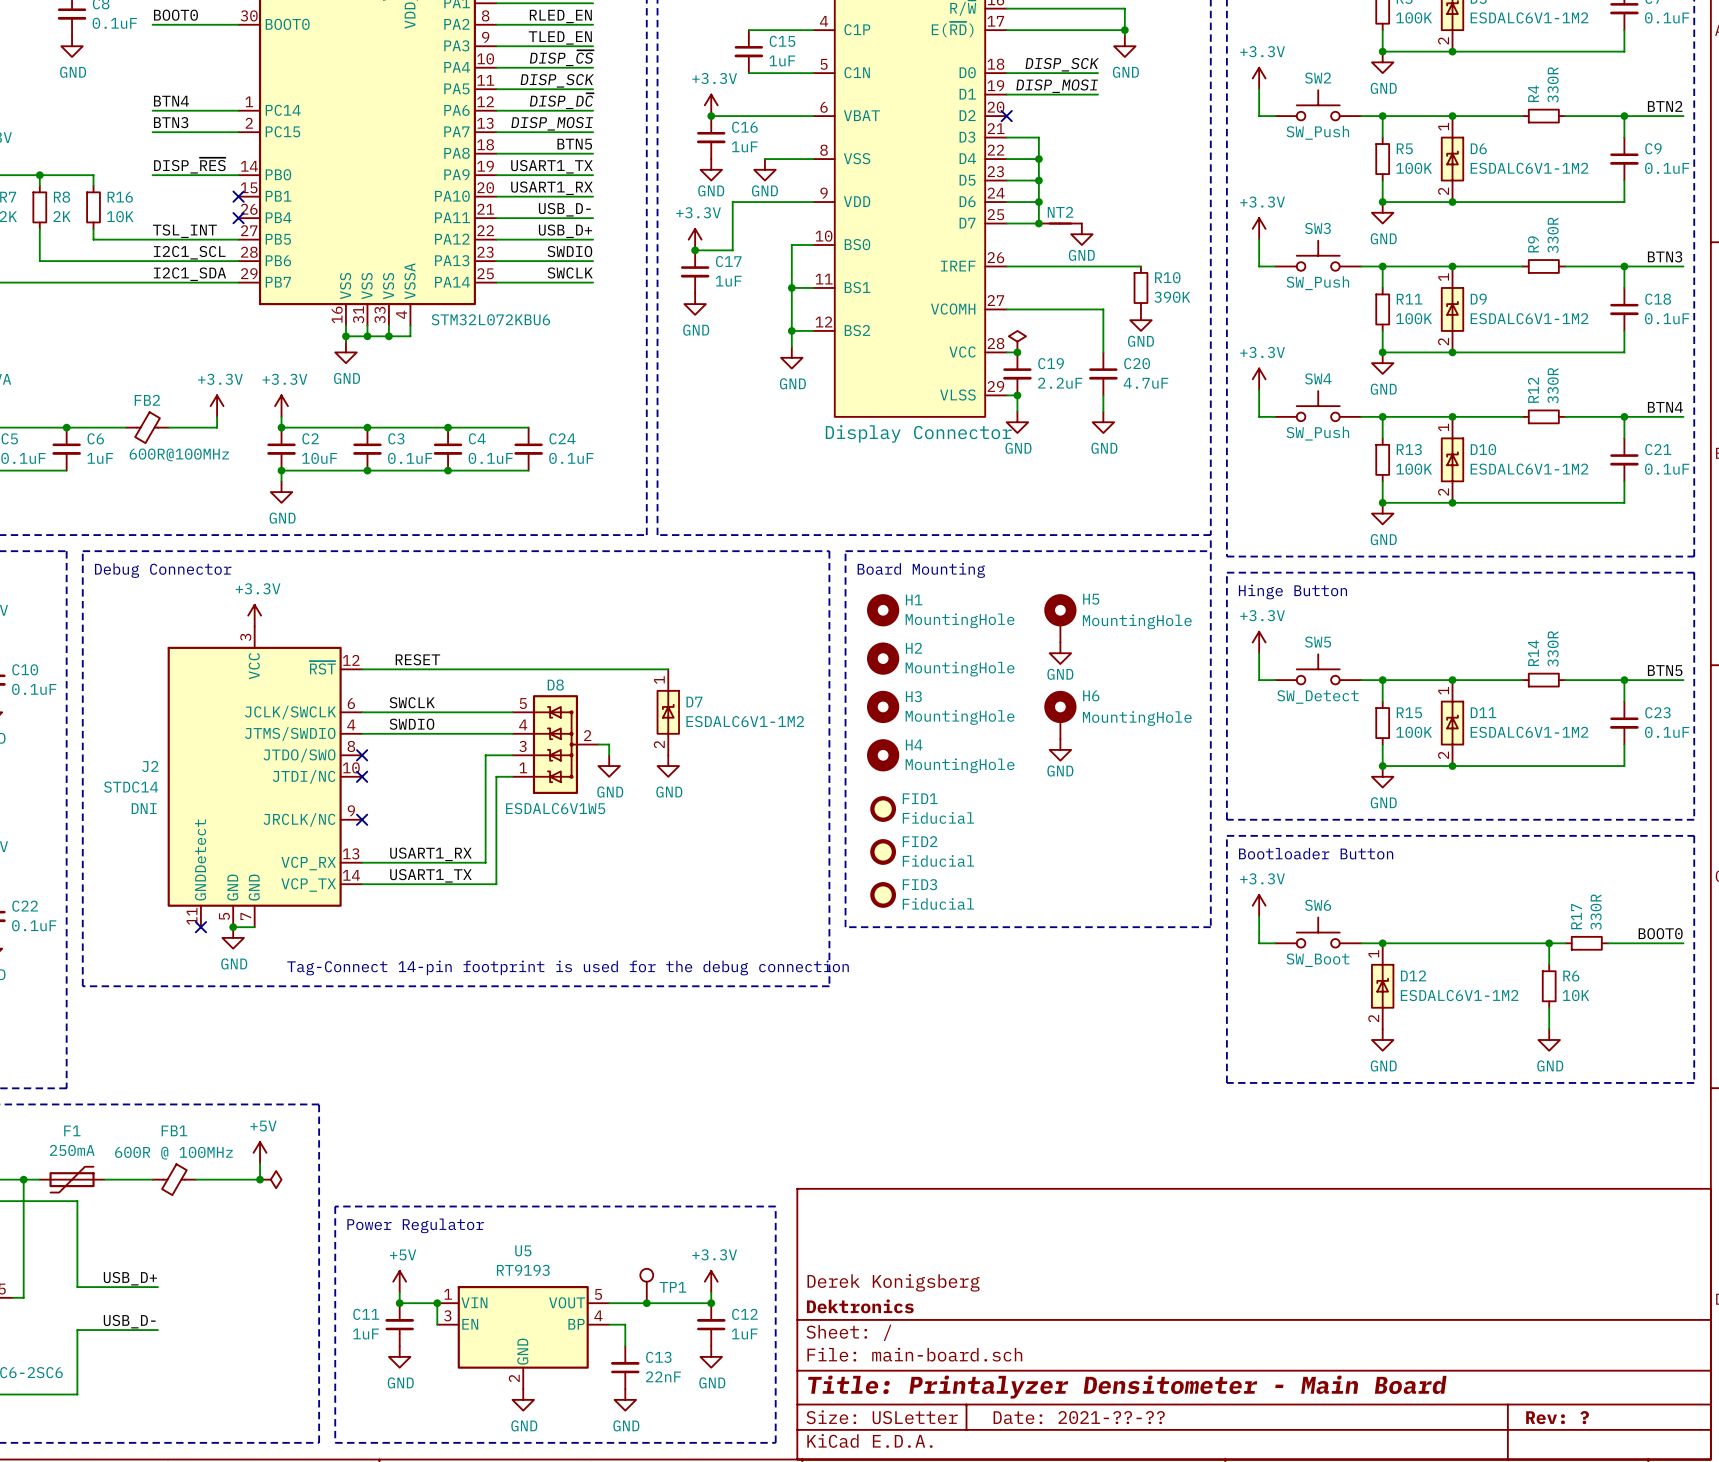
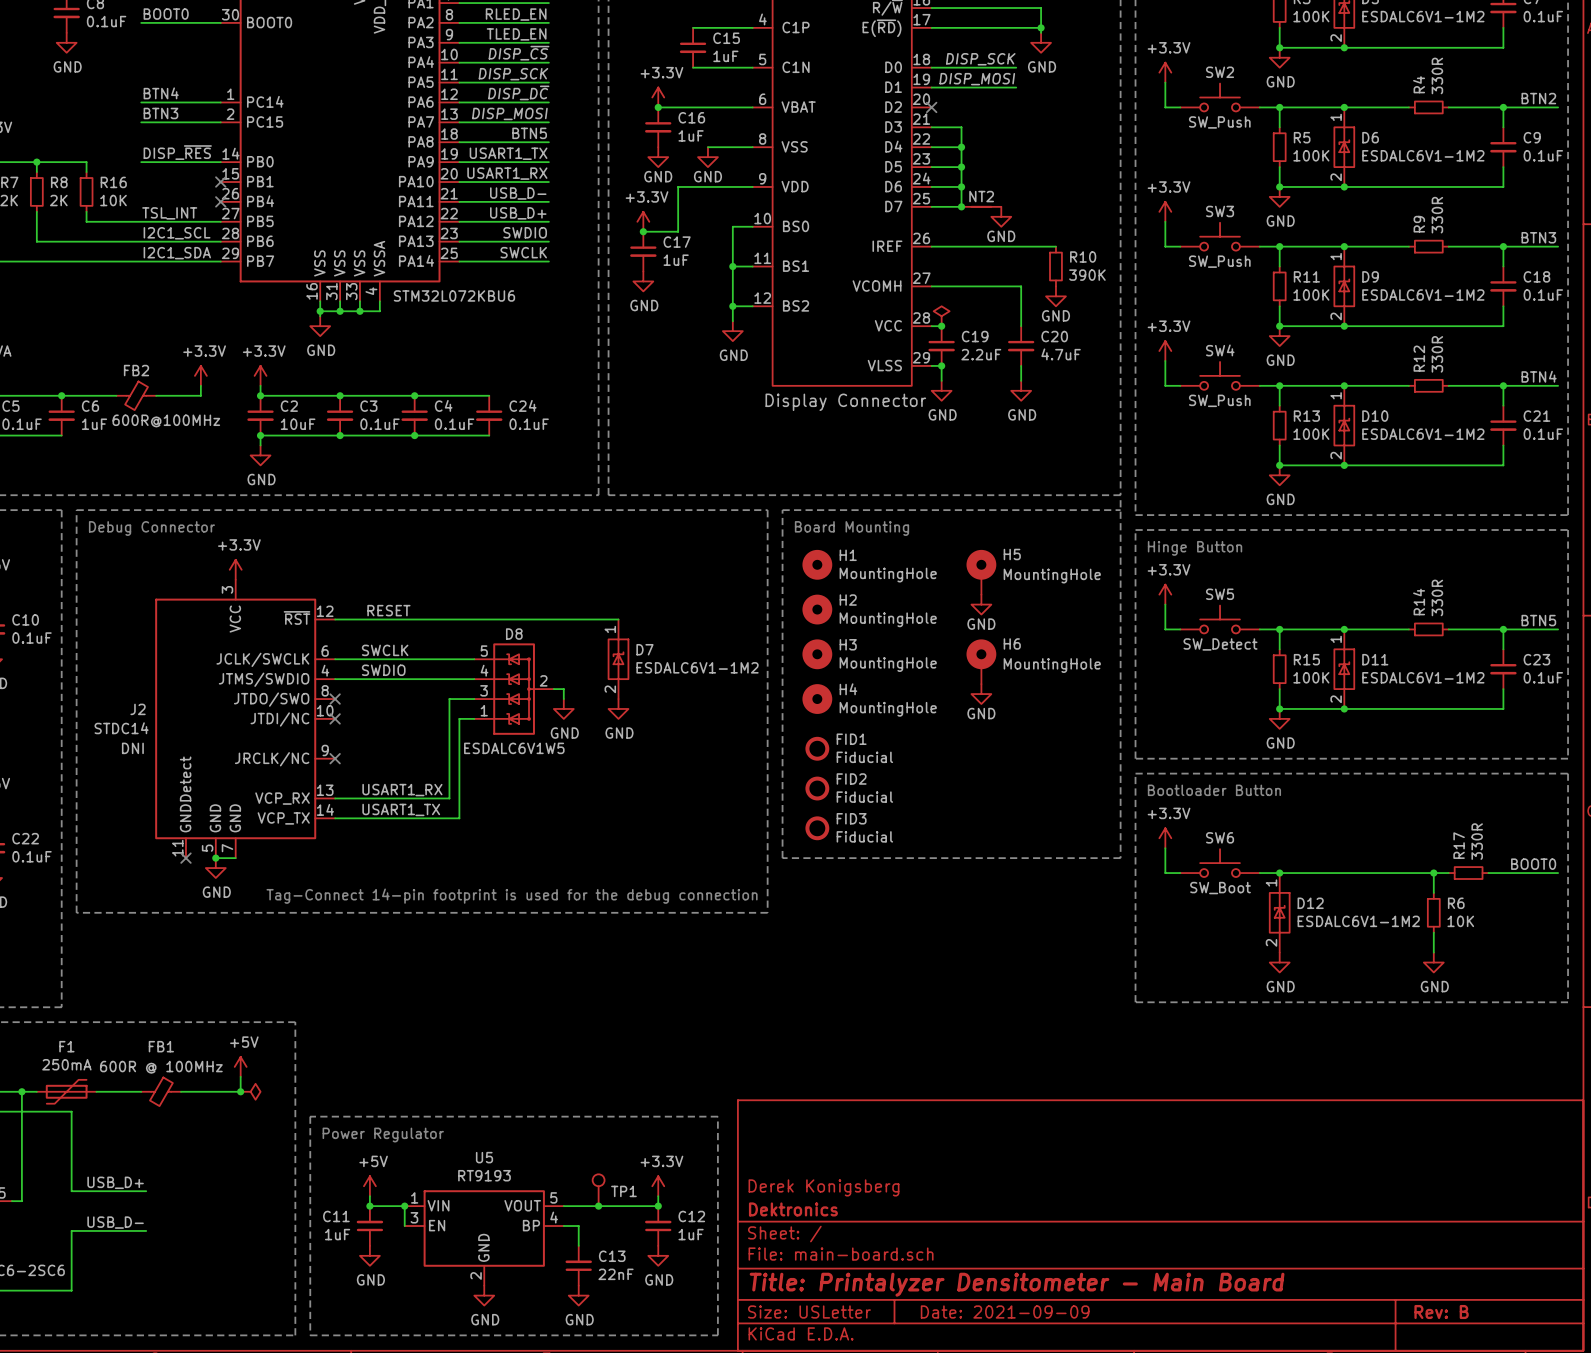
title block: Date: 2021-??-?? (1079, 1417) -> Date: 2021-09-09 (1005, 1312)
title block: Rev: ? (1557, 1417) -> Rev: B (1441, 1312)

